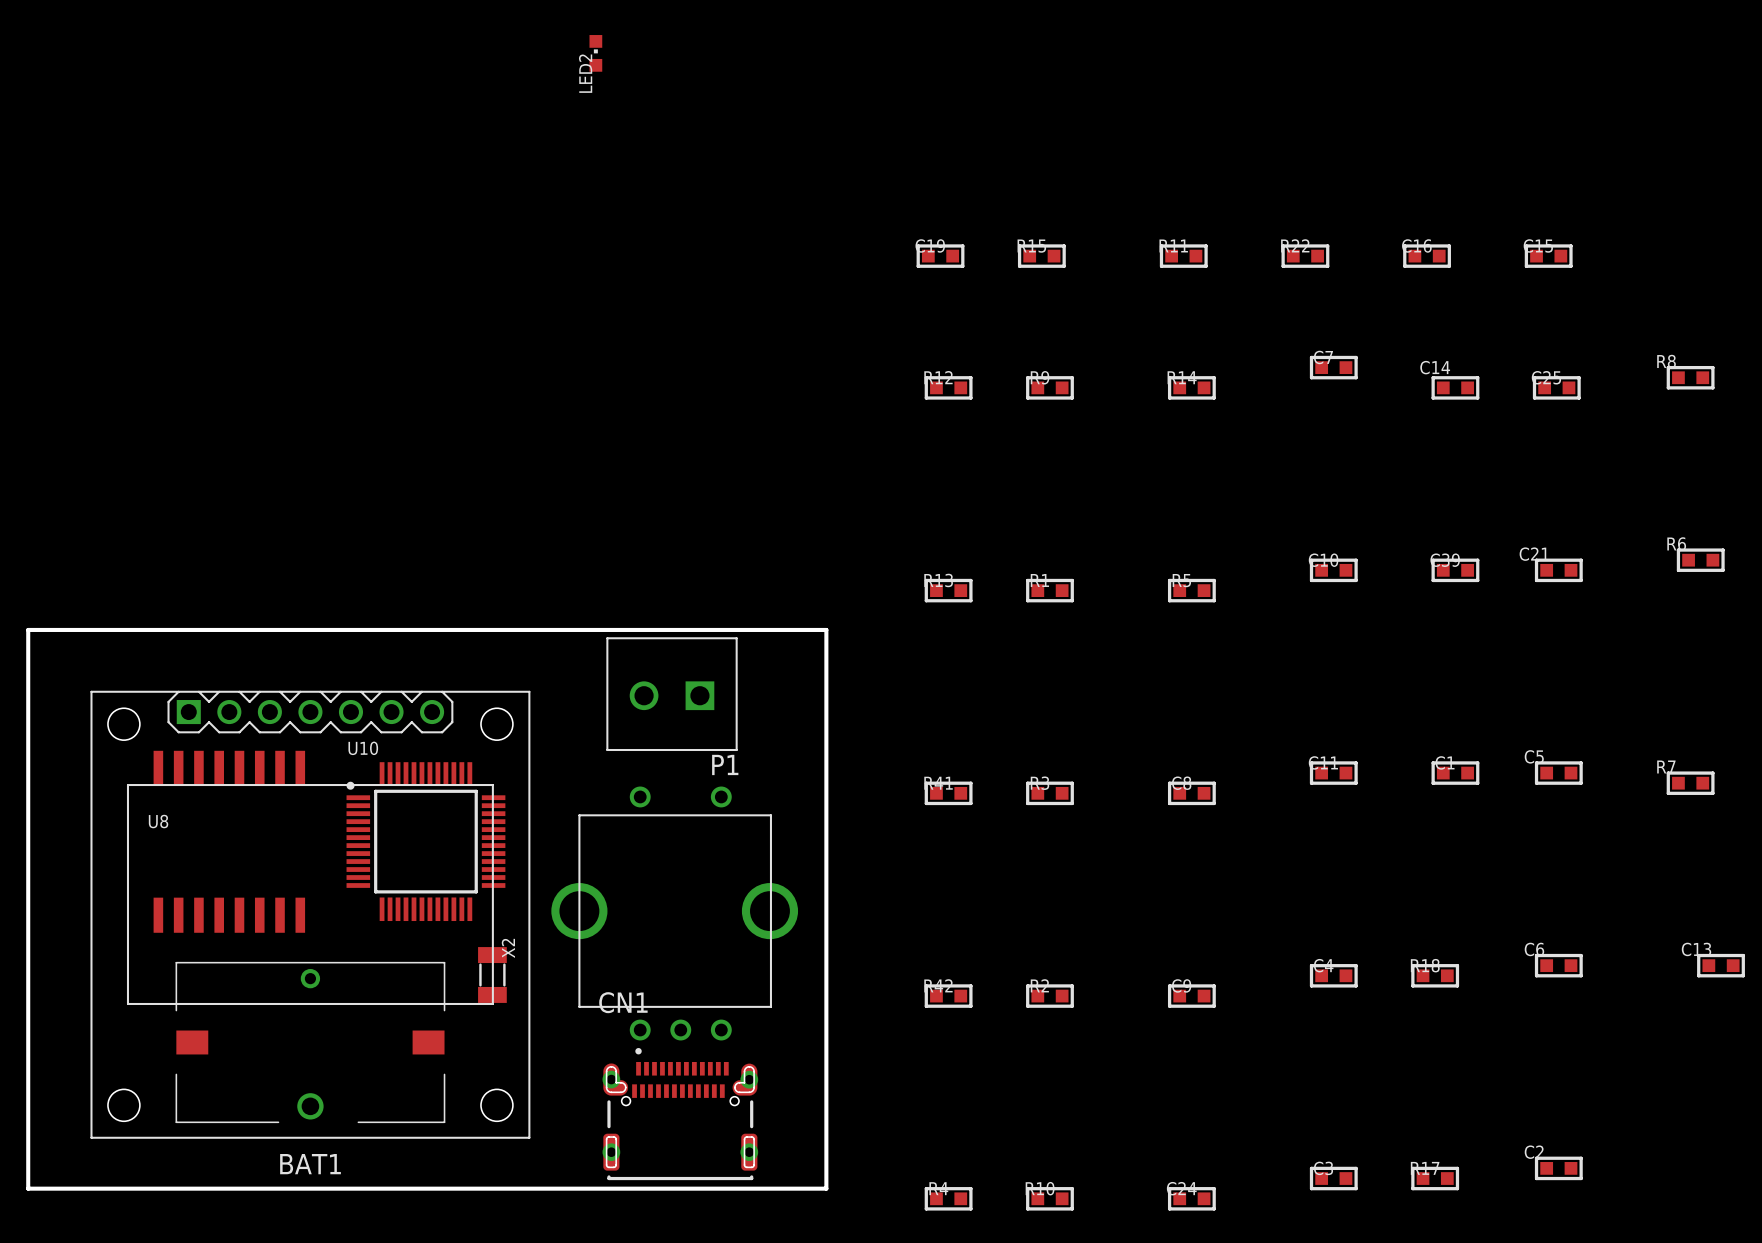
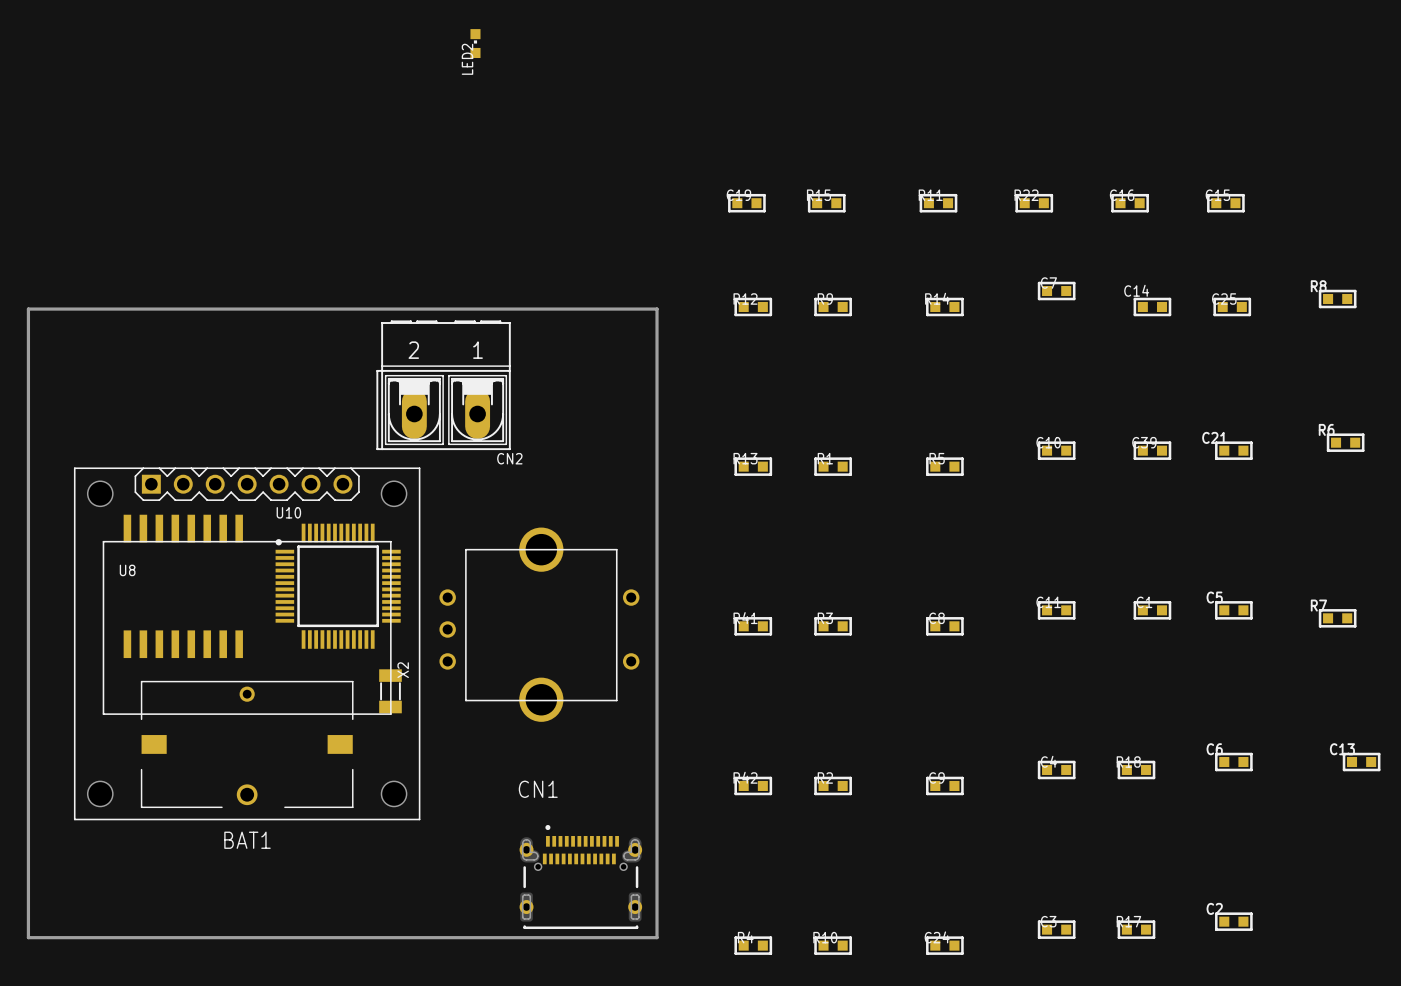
CN2: none -> (443, 385)
board edge: (28, 629) (826, 629) -> (28, 497) (28, 309) (657, 309) (657, 497)
P1: (672, 694) -> none
U8 position: (229, 841) -> (183, 586)
U10 position: (425, 841) -> (338, 586)
part rotation: 0° (674, 913) -> 90° clockwise (539, 624)
part position: (310, 914) -> (247, 643)
X2 position: (492, 975) -> (390, 691)
BAT1 position: (310, 1042) -> (247, 744)
CN1 position: (680, 1114) -> (580, 877)

